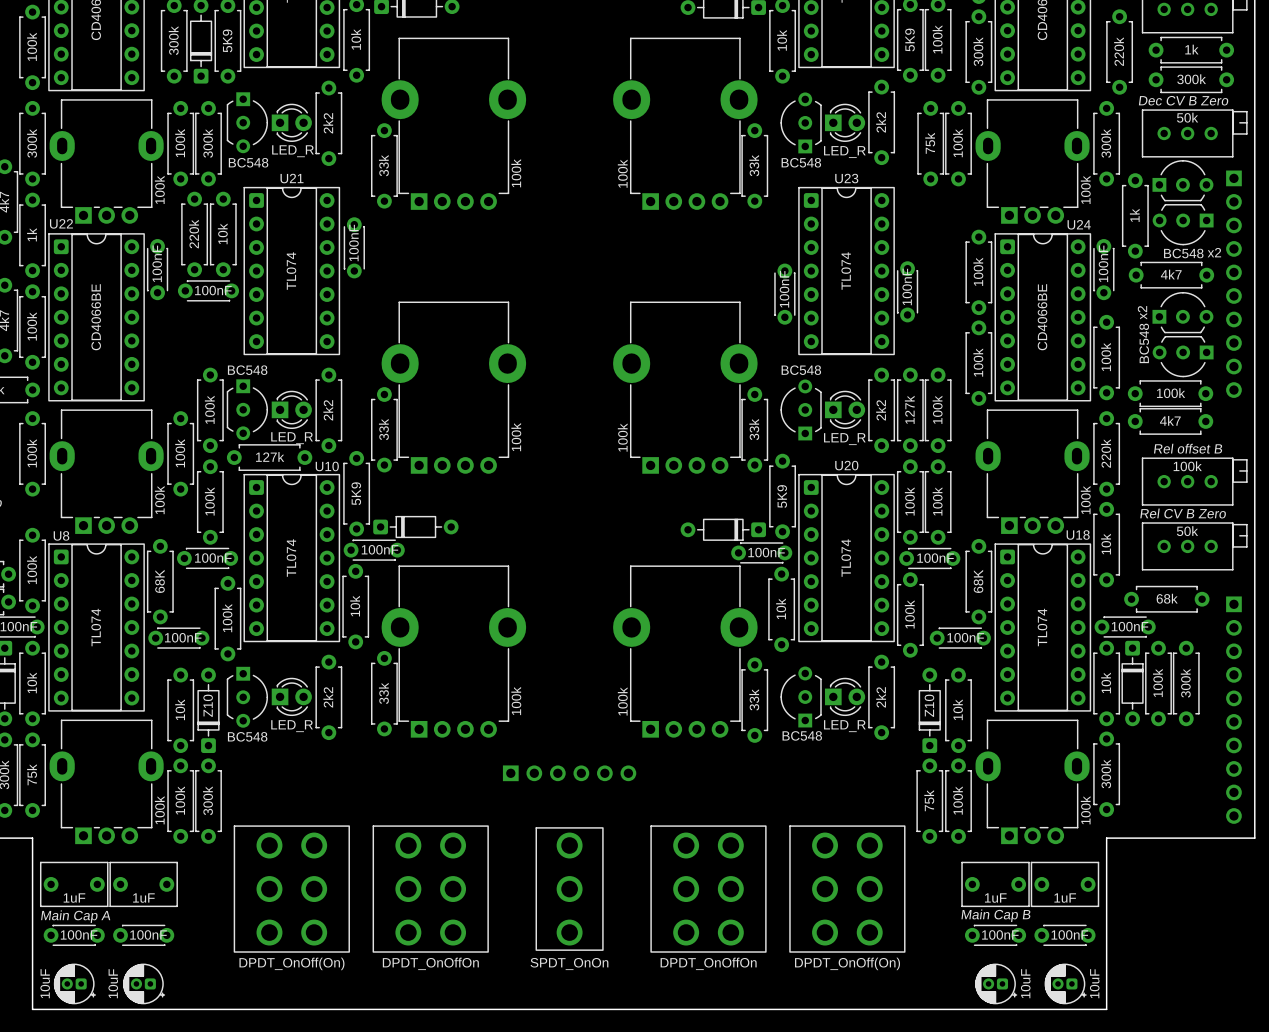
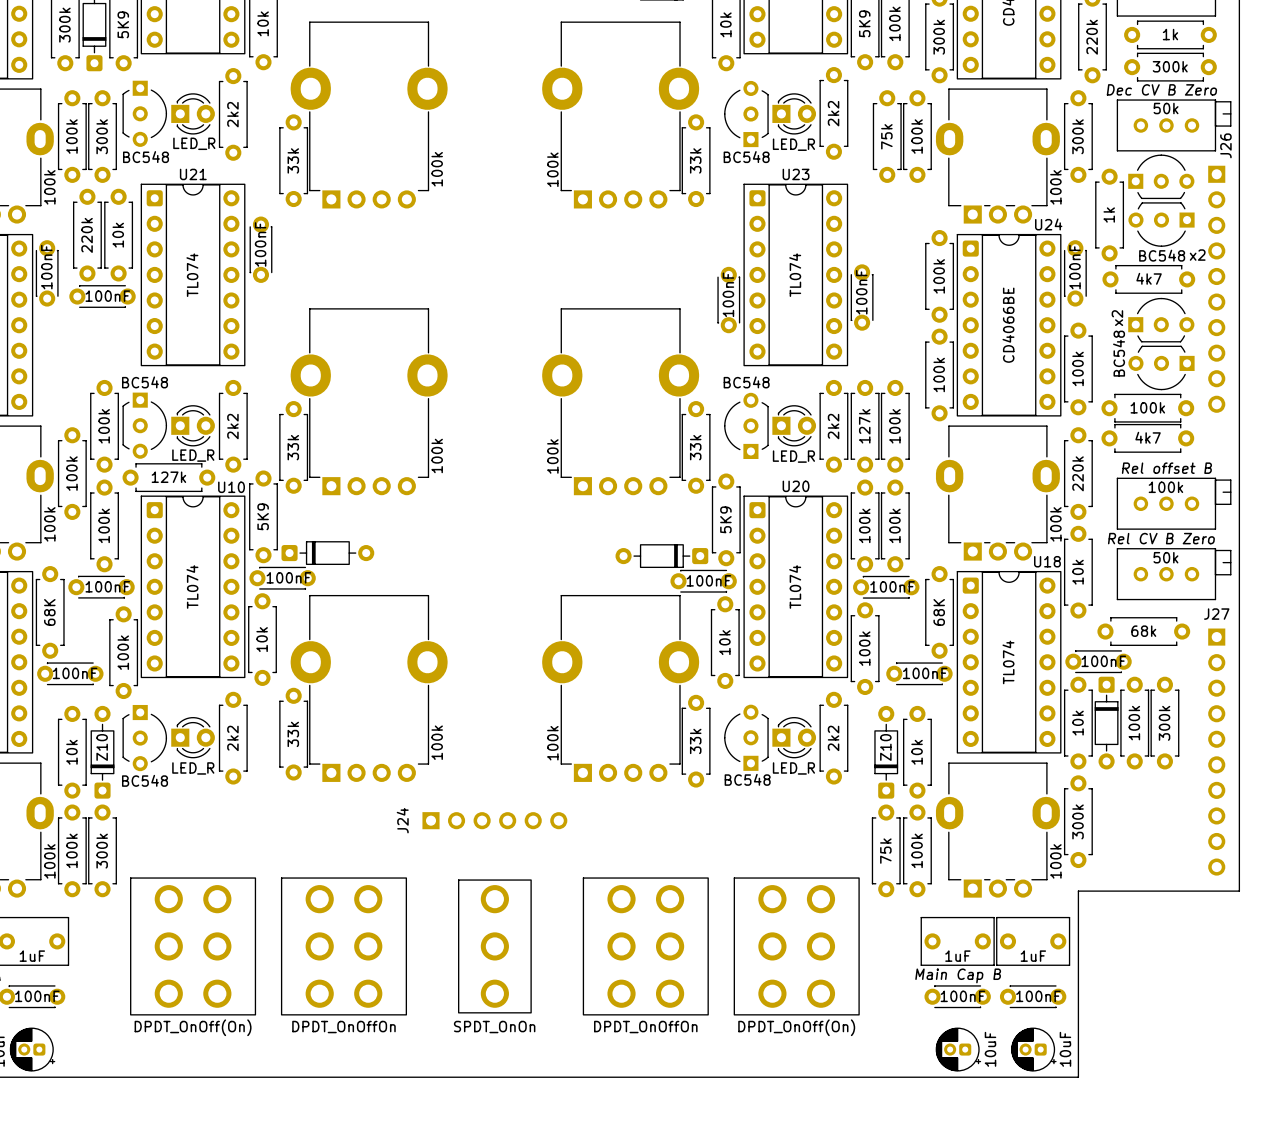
J26 name: none -> J26 (1225, 145)
J27 name: none -> J27 (1216, 614)
J24 name: none -> J24 (402, 820)

